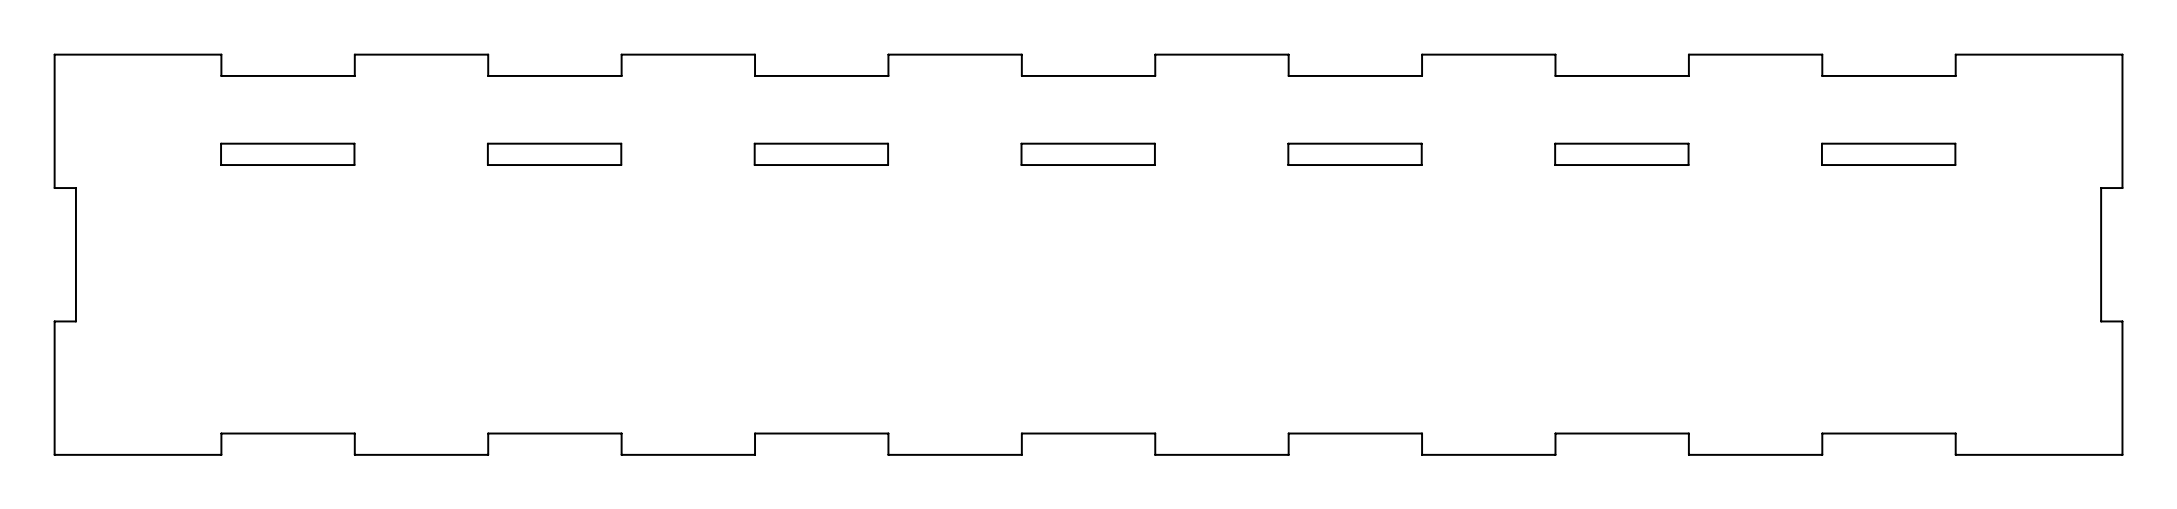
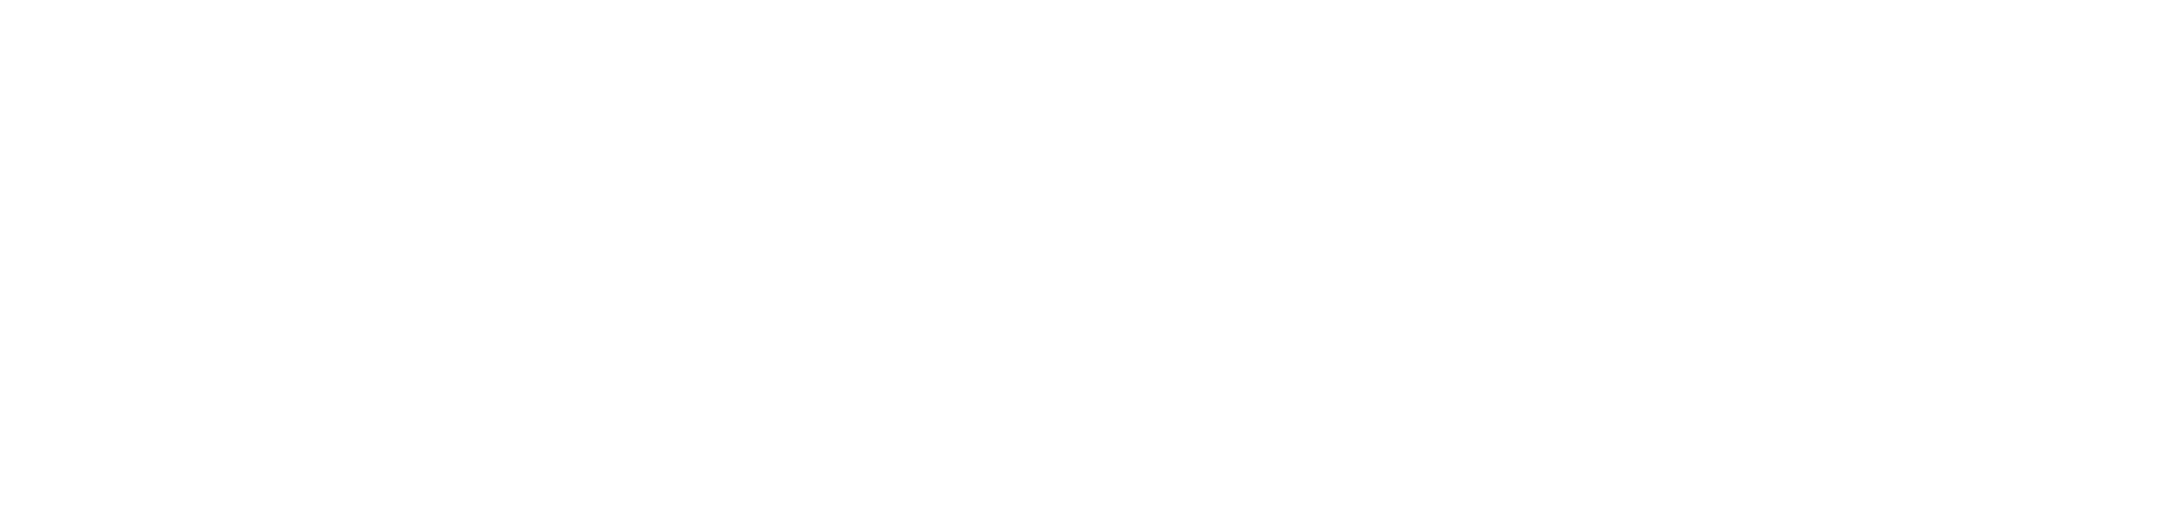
board edge: (2122, 54) (1955, 54) (1955, 75) (1822, 75) (1822, 54) (1688, 54) (1688, 75) (1555, 75) (1555, 54) (1422, 54) (1422, 75) (1288, 75) (1288, 54) (1155, 54) (1155, 75) (1021, 75) (1021, 54) (888, 54) (888, 75) (755, 75) (755, 54) (621, 54) (621, 75) (488, 75) (488, 54) (354, 54) (354, 75) (221, 75) (221, 54) (54, 54) (54, 188) (75, 188) (75, 321) (54, 321) (54, 454) (221, 454) (221, 433) (354, 433) (354, 454) (488, 454) (488, 433) (621, 433) (621, 454) (755, 454) (755, 433) (888, 433) (888, 454) (1021, 454) (1021, 433) (1155, 433) (1155, 454) (1288, 454) (1288, 433) (1422, 433) (1422, 454) (1555, 454) (1555, 433) (1688, 433) (1688, 454) (1822, 454) (1822, 433) (1955, 433) (1955, 454) (2122, 454) (2122, 321) (2101, 321) (2101, 188) (2122, 188) (2122, 54) -> none
board edge: (354, 143) (221, 143) (221, 165) (354, 165) (354, 143) -> none
board edge: (621, 143) (487, 143) (487, 165) (621, 165) (621, 143) -> none
board edge: (888, 143) (754, 143) (754, 165) (888, 165) (888, 143) -> none
board edge: (1154, 143) (1021, 143) (1021, 165) (1154, 165) (1154, 143) -> none
board edge: (1421, 143) (1288, 143) (1288, 165) (1421, 165) (1421, 143) -> none
board edge: (1688, 143) (1555, 143) (1555, 165) (1688, 165) (1688, 143) -> none
board edge: (1955, 143) (1821, 143) (1821, 165) (1955, 165) (1955, 143) -> none

